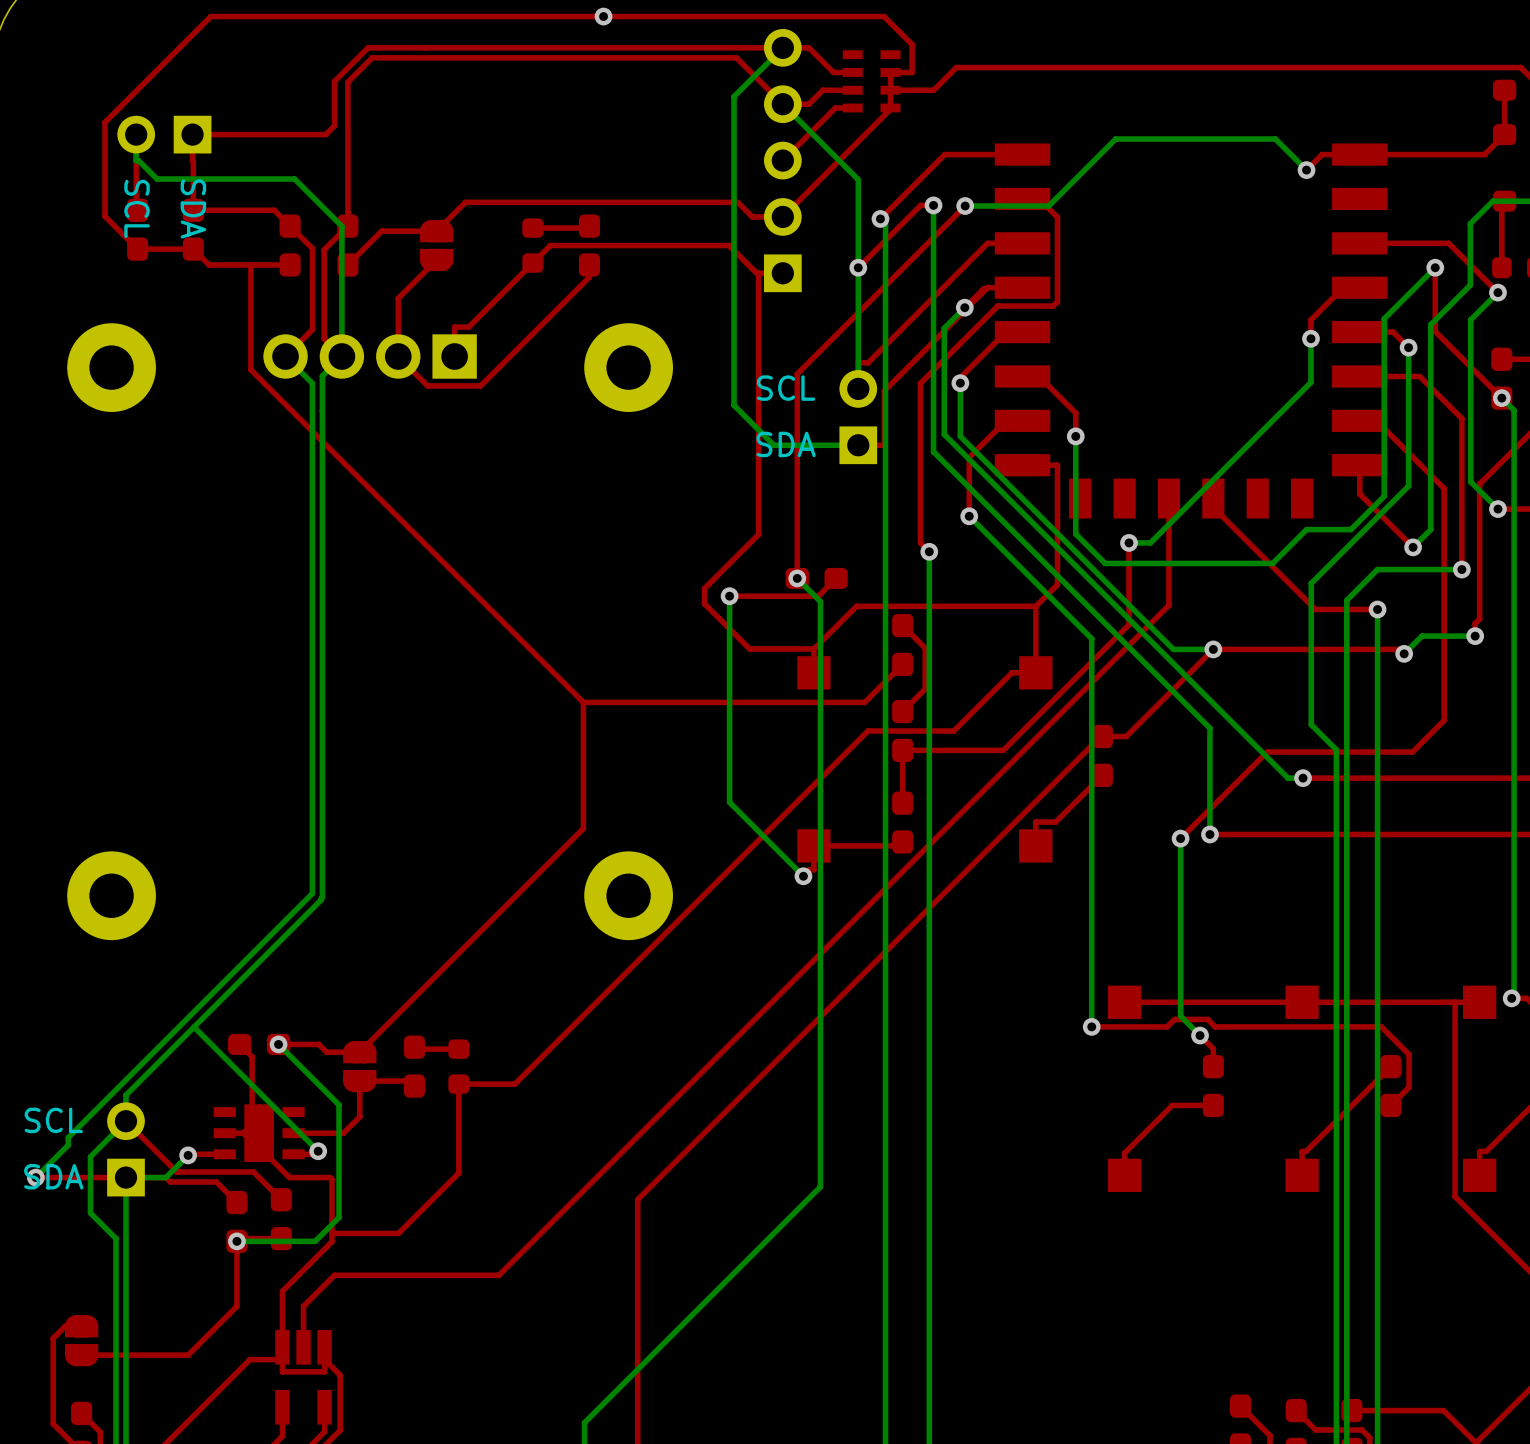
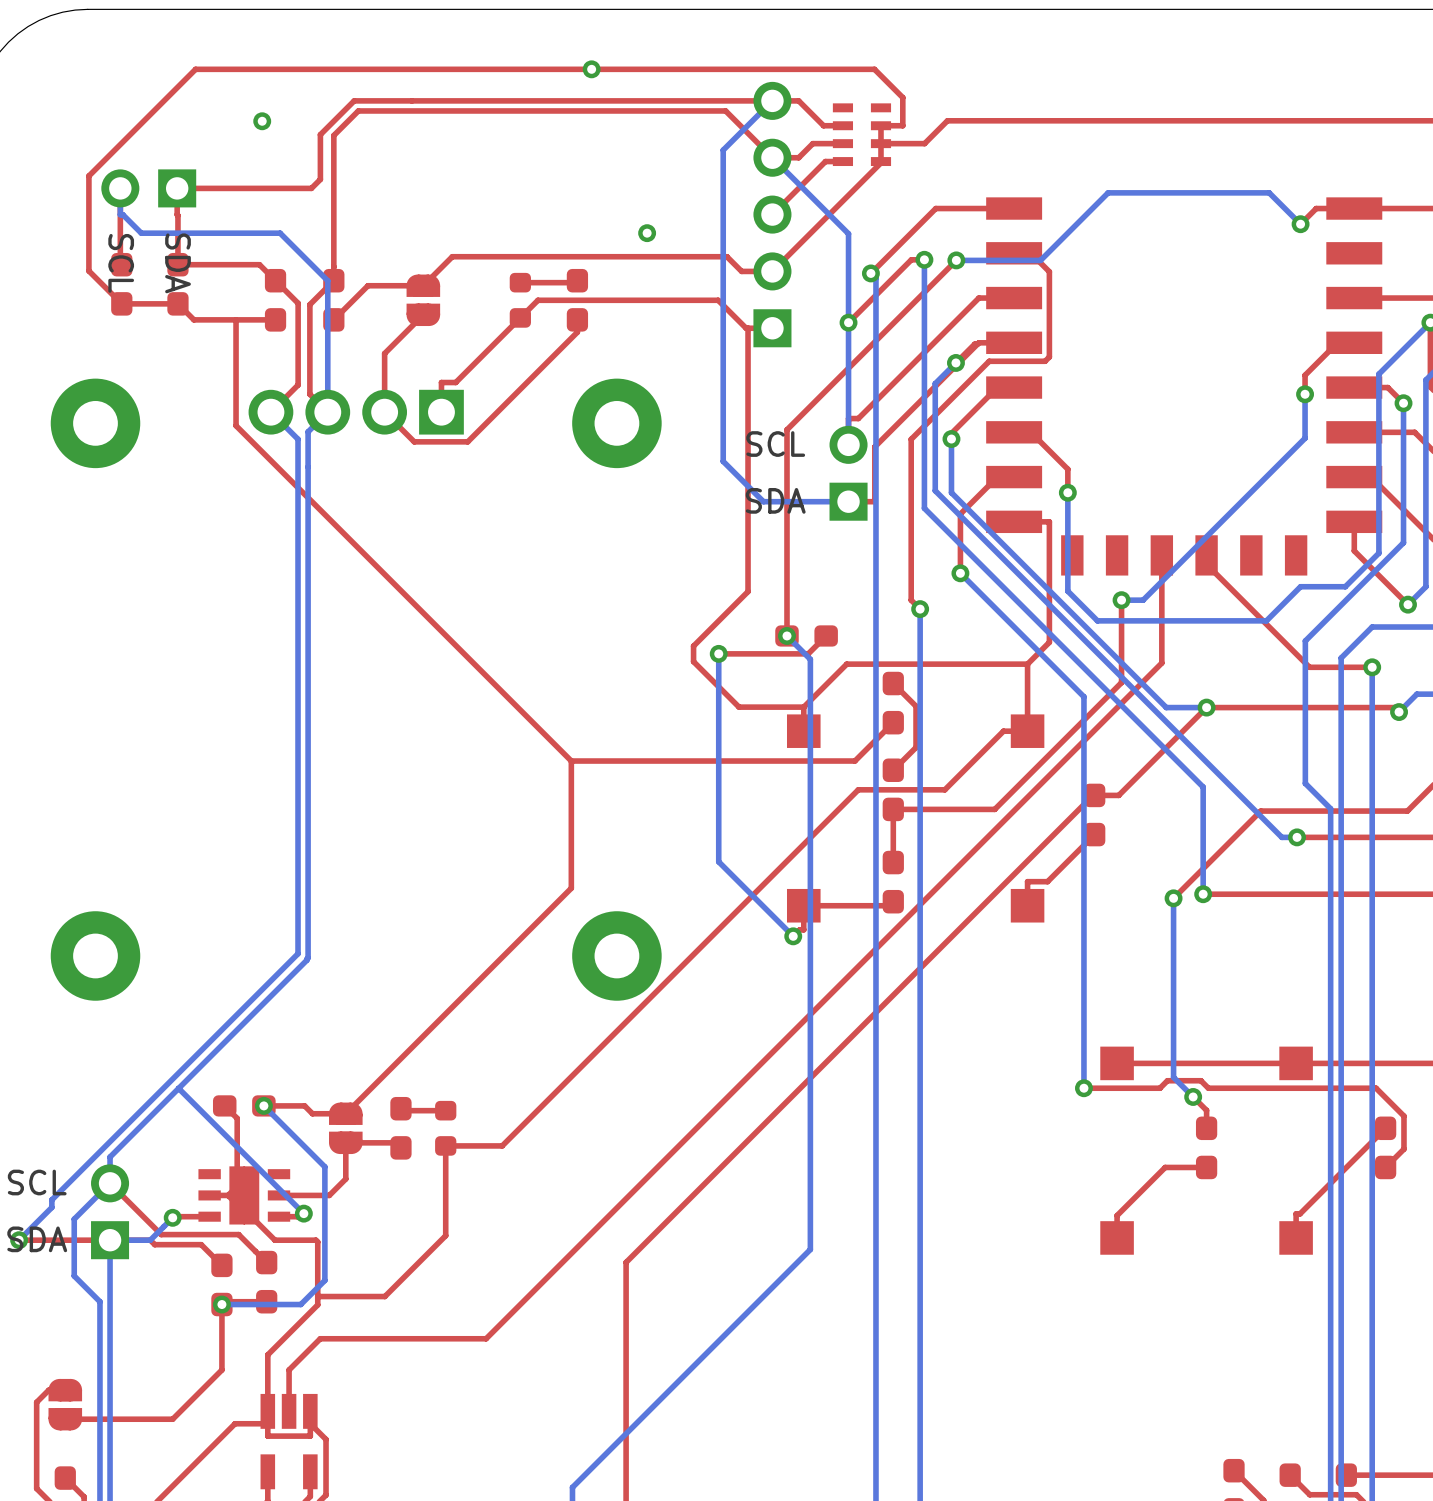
via: none -> (262, 121)
via: none -> (647, 233)

